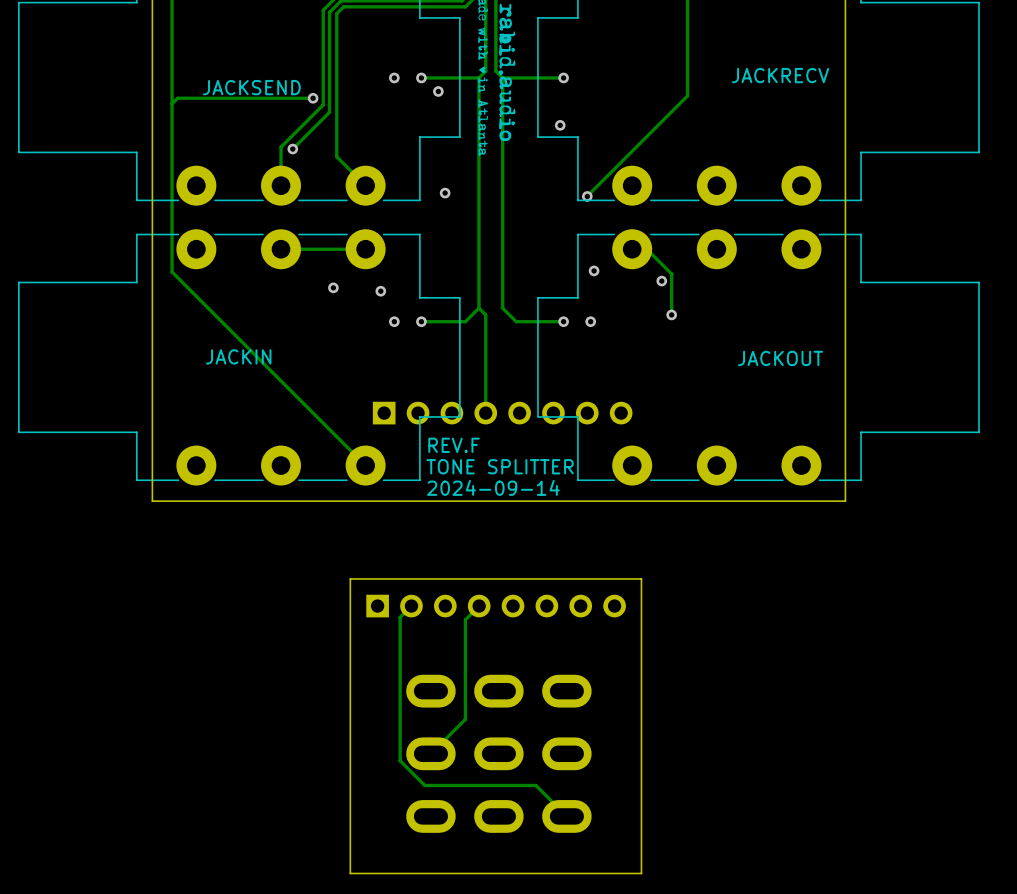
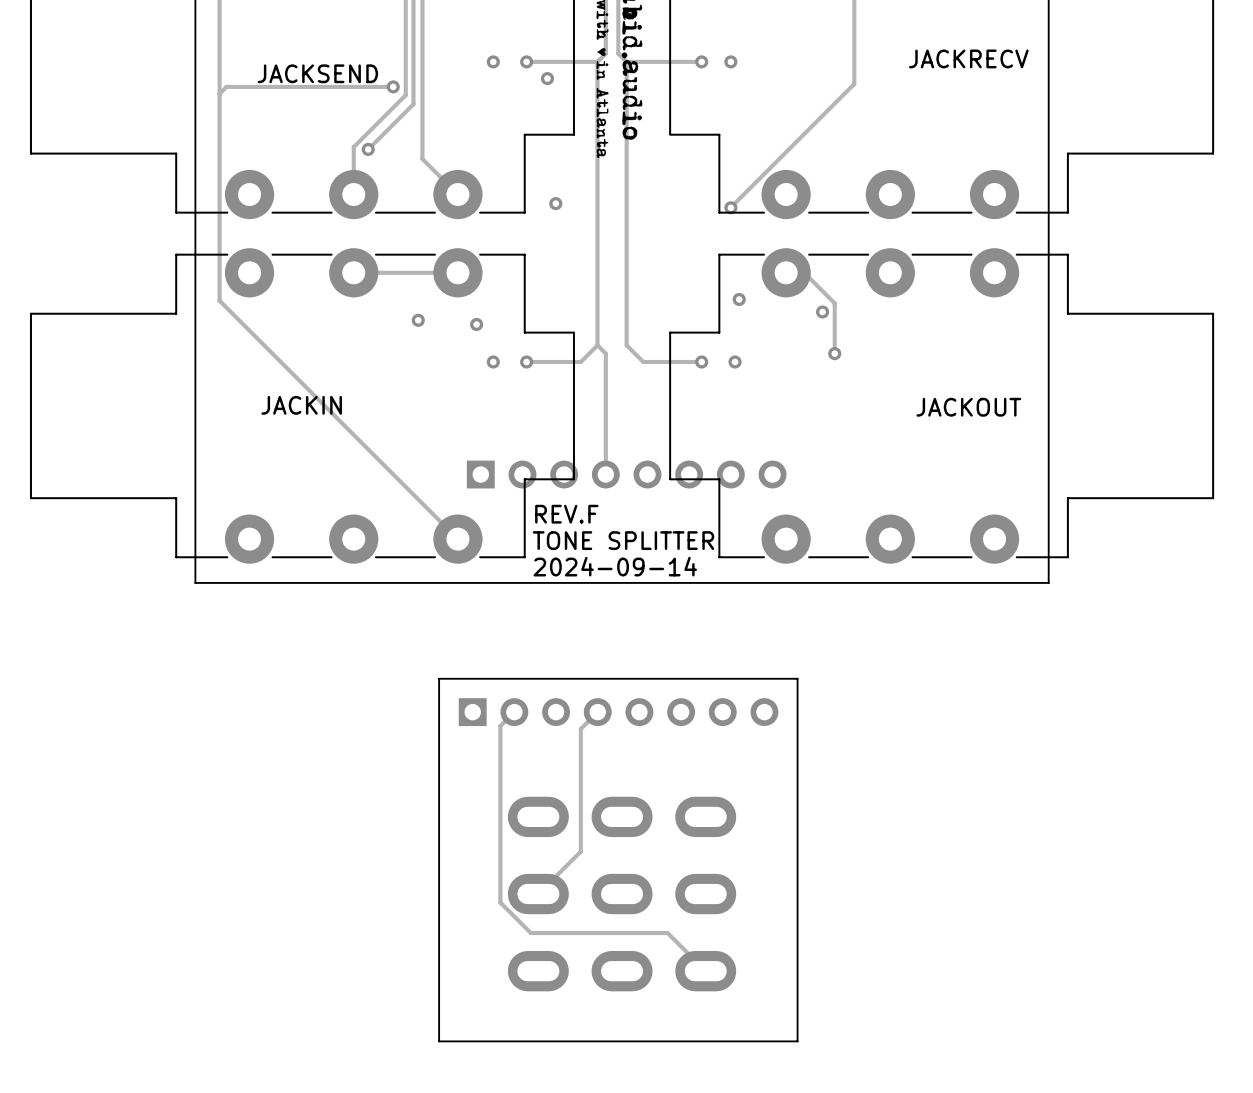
via position: (560, 125) -> (730, 61)

